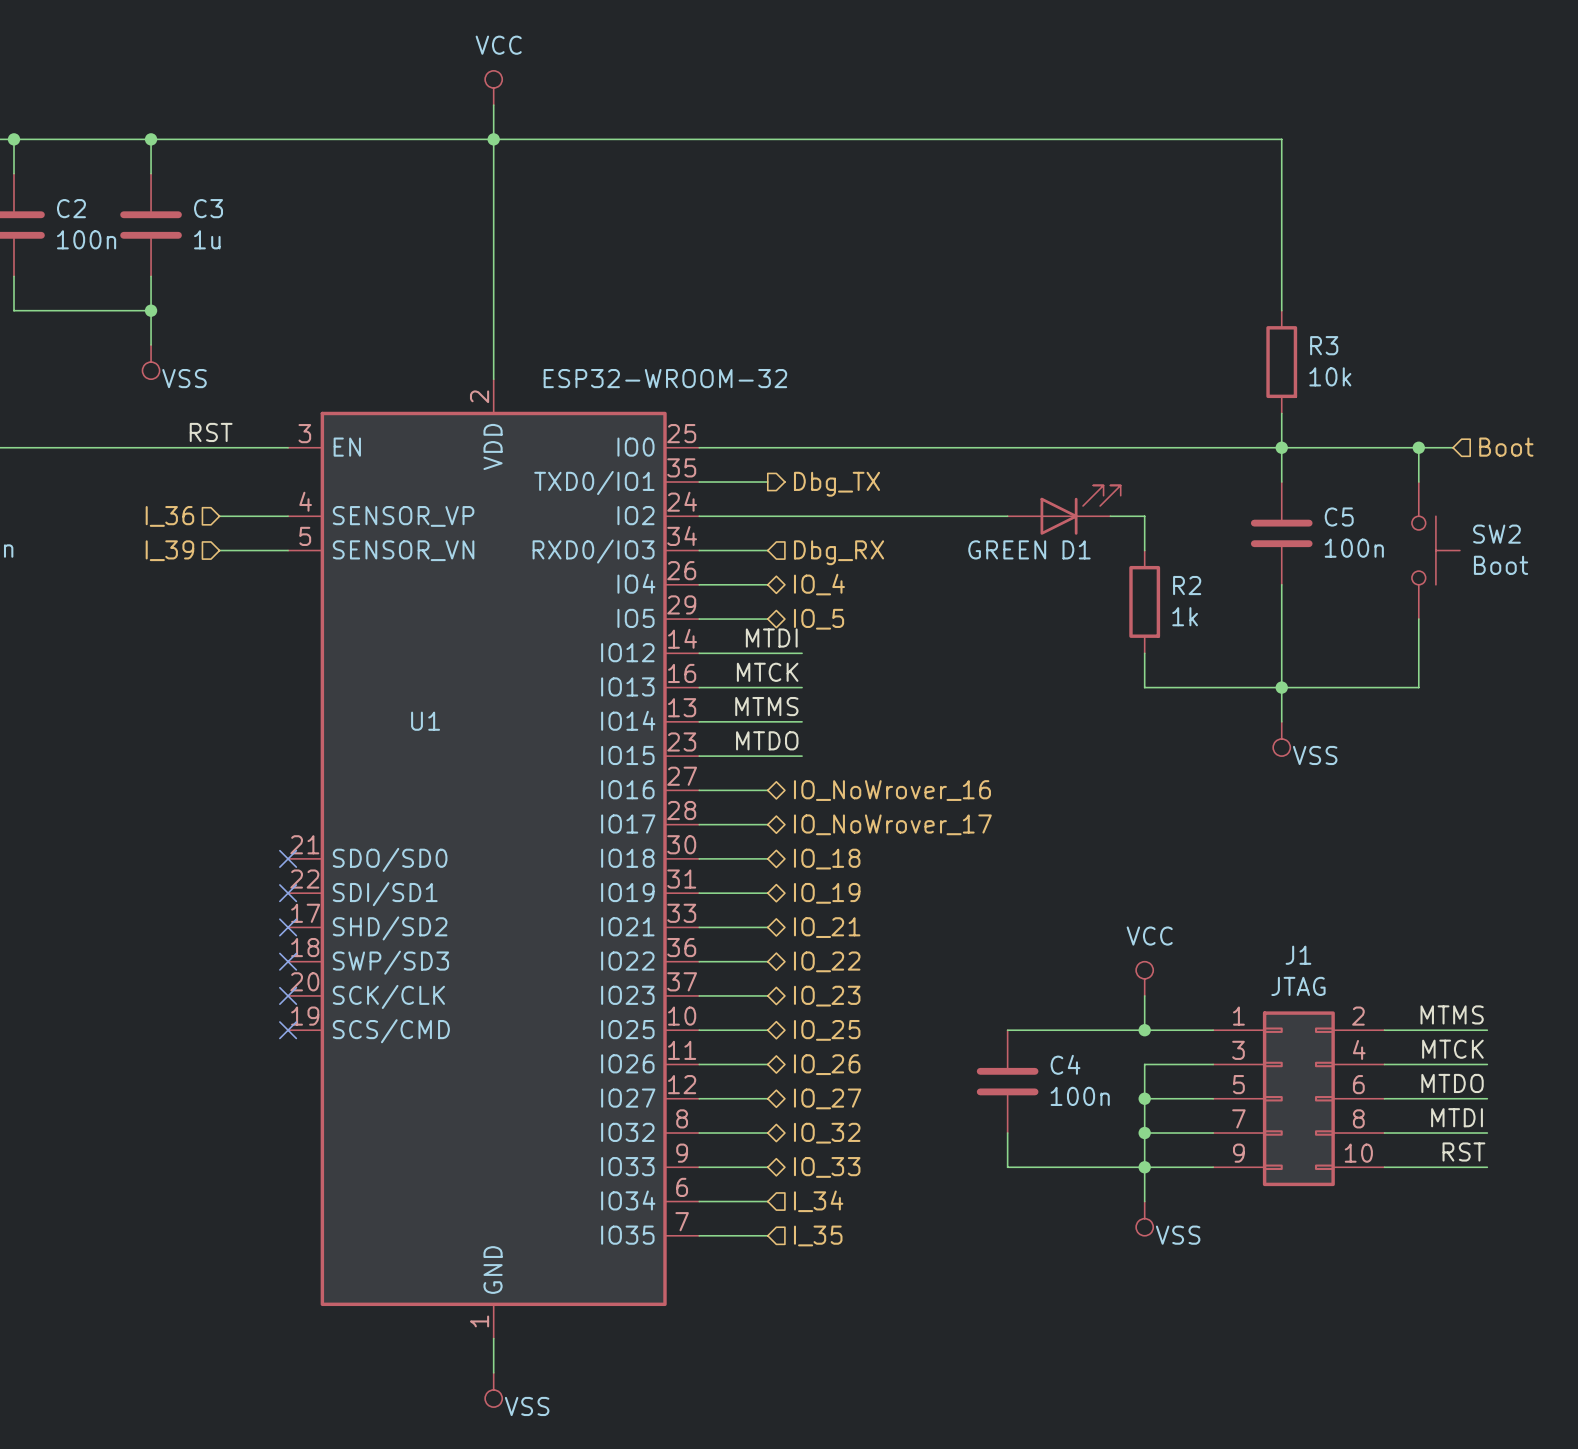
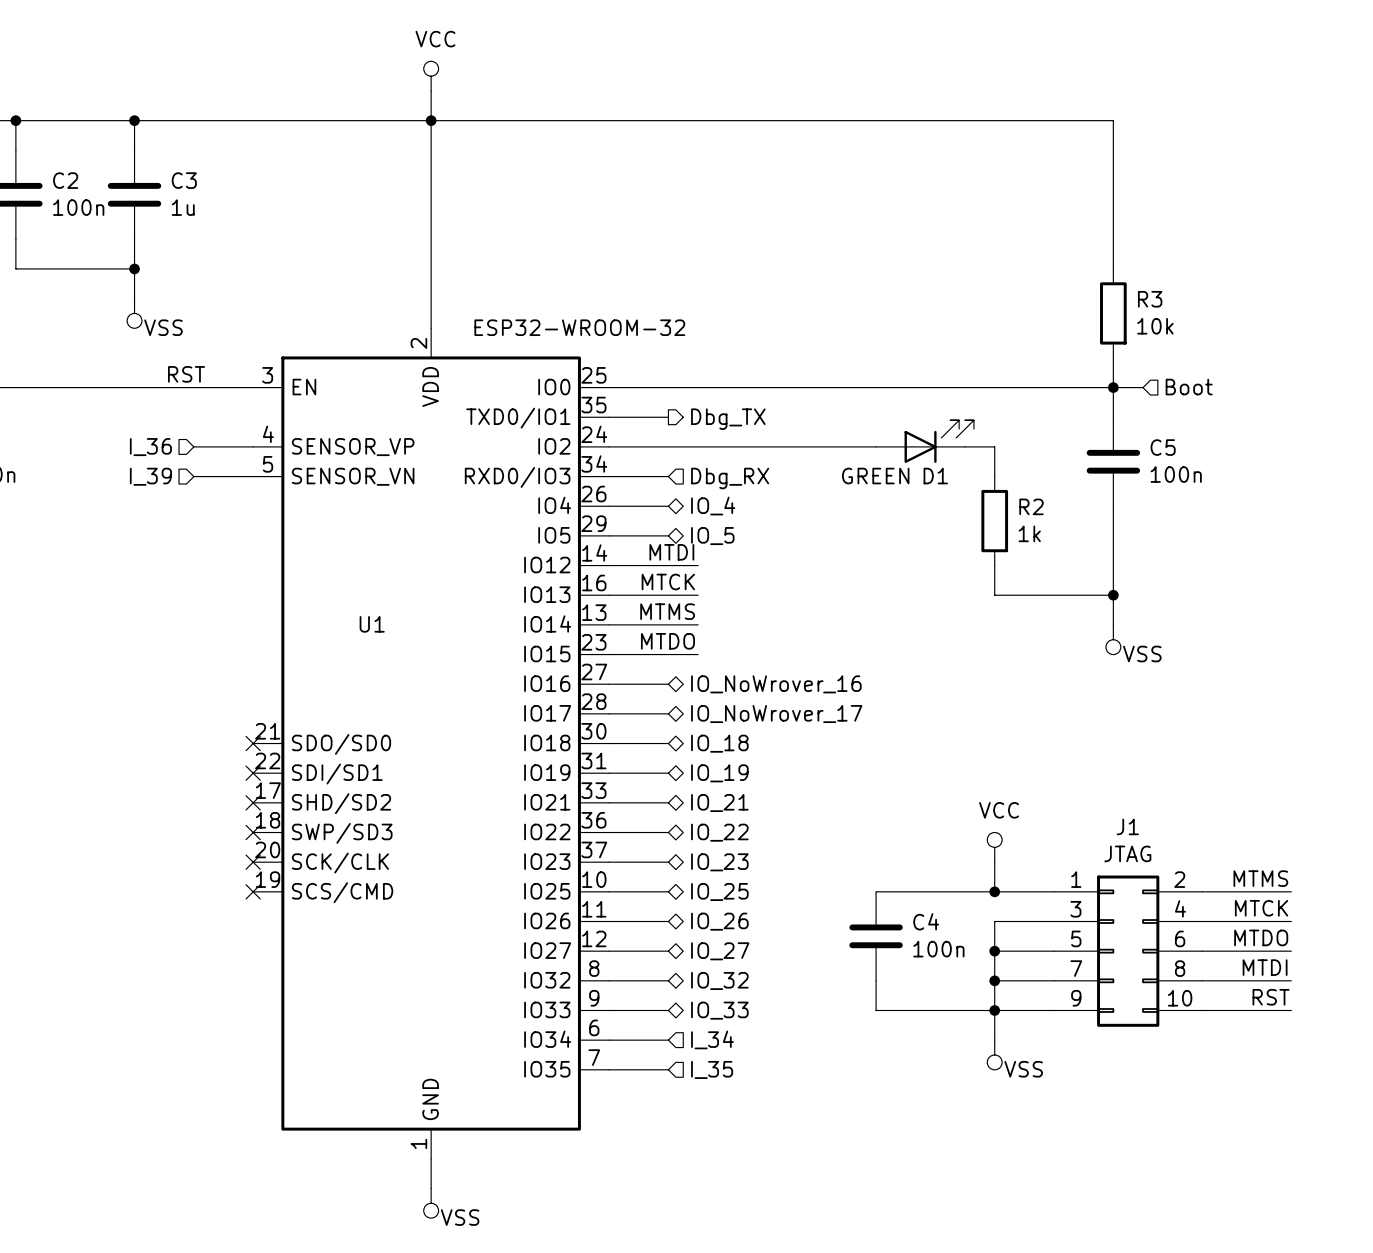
wire: (1316, 447) (1453, 447) -> none
wire: (1418, 447) (1418, 482) -> none
junction: (1418, 447) -> none
hierarchical label position: Boot (1506, 447) -> Boot (1189, 387)
SW2: Boot (1435, 550) -> none
wire: (1418, 619) (1418, 687) (1281, 687) -> none

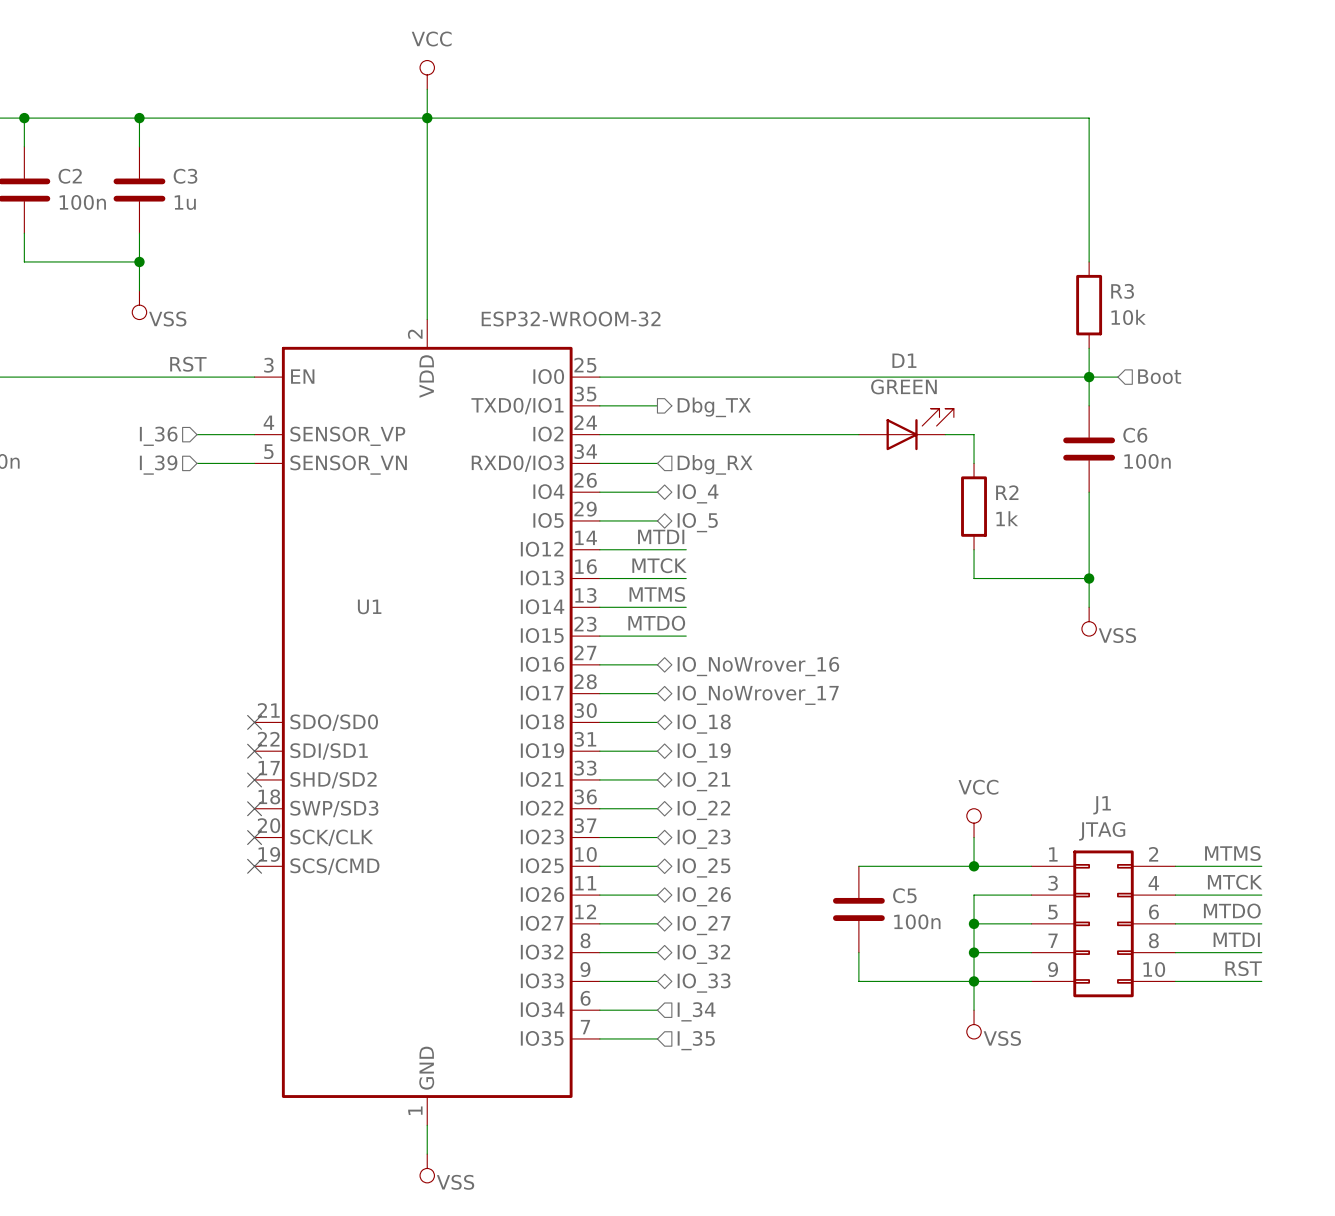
C5 name: C5 (1163, 447) -> C6 (1135, 435)
D1 value position: GREEN (875, 476) -> GREEN (903, 386)
D1 name position: D1 (935, 476) -> D1 (904, 360)
C4 name: C4 (926, 921) -> C5 (904, 895)

